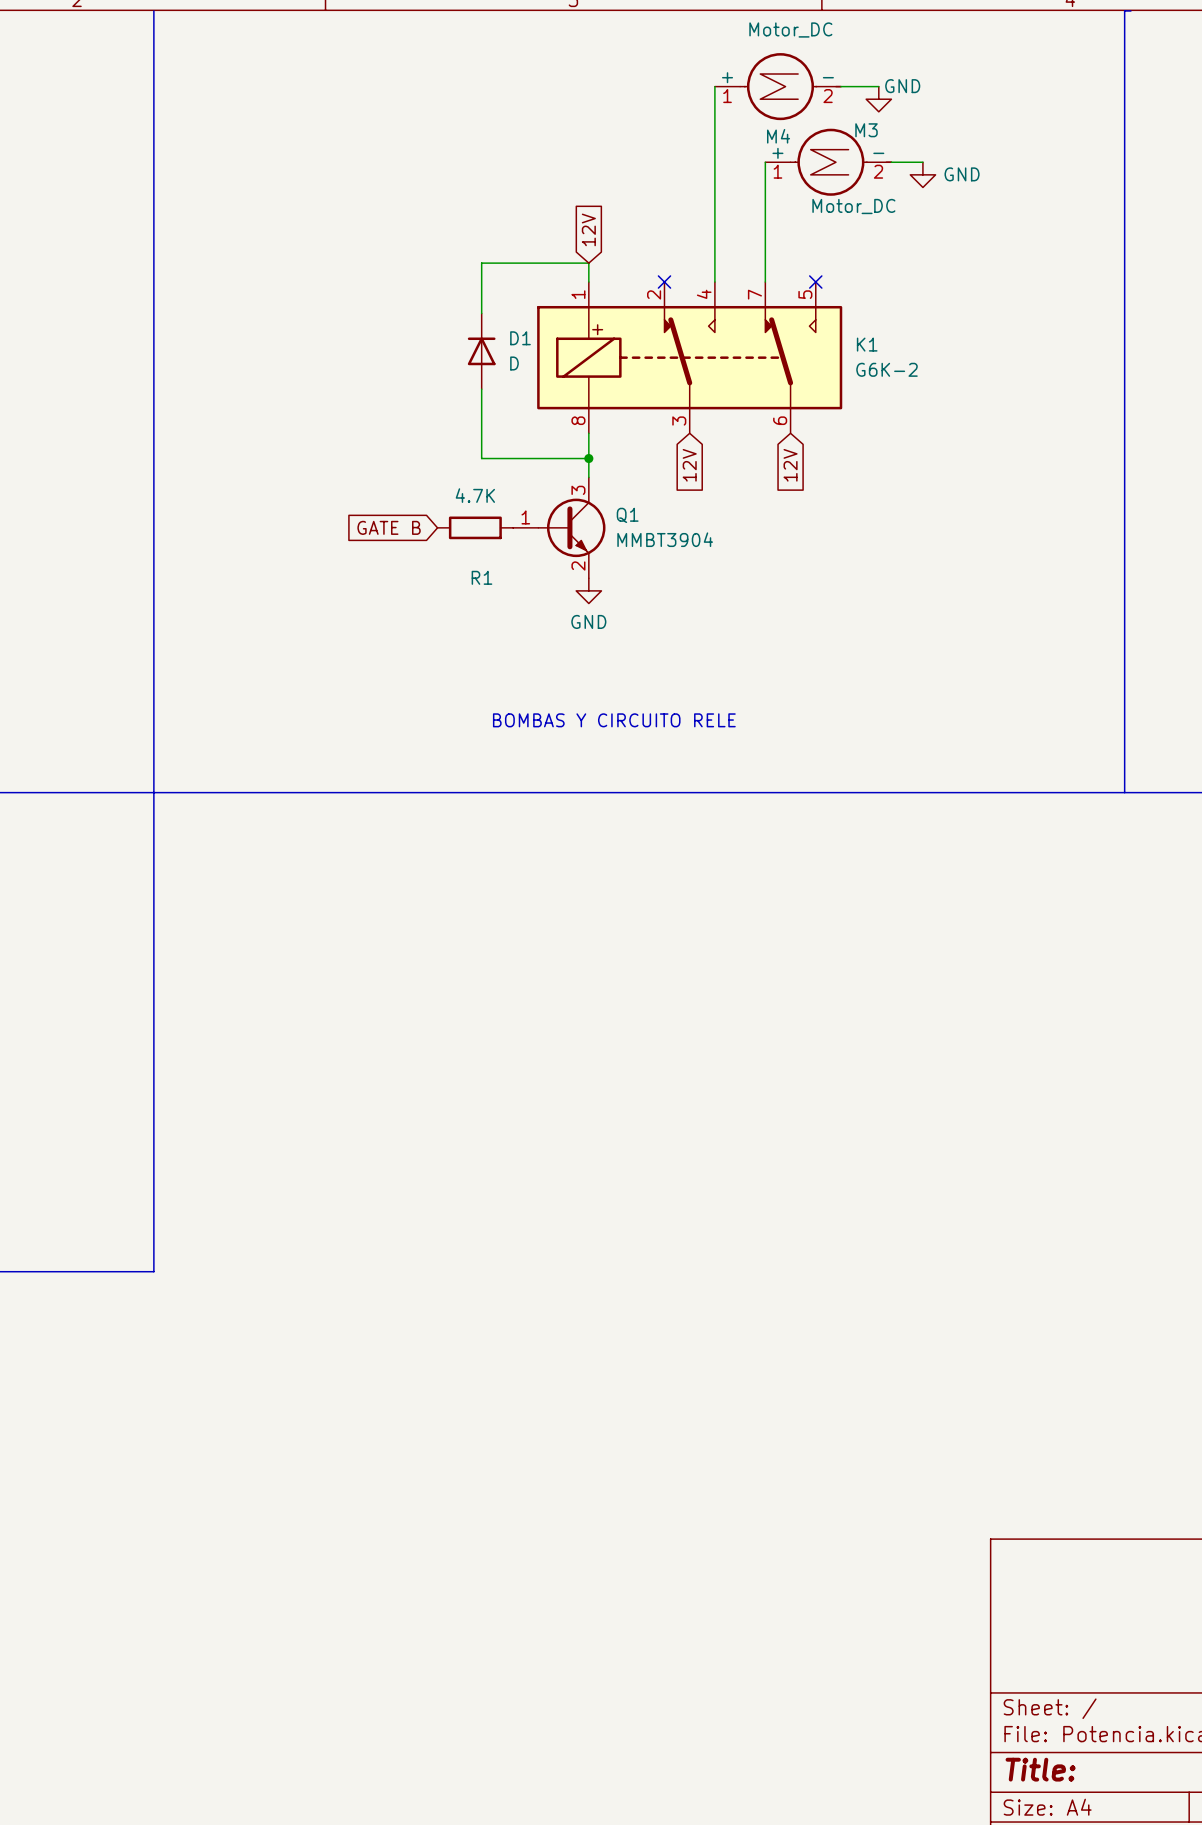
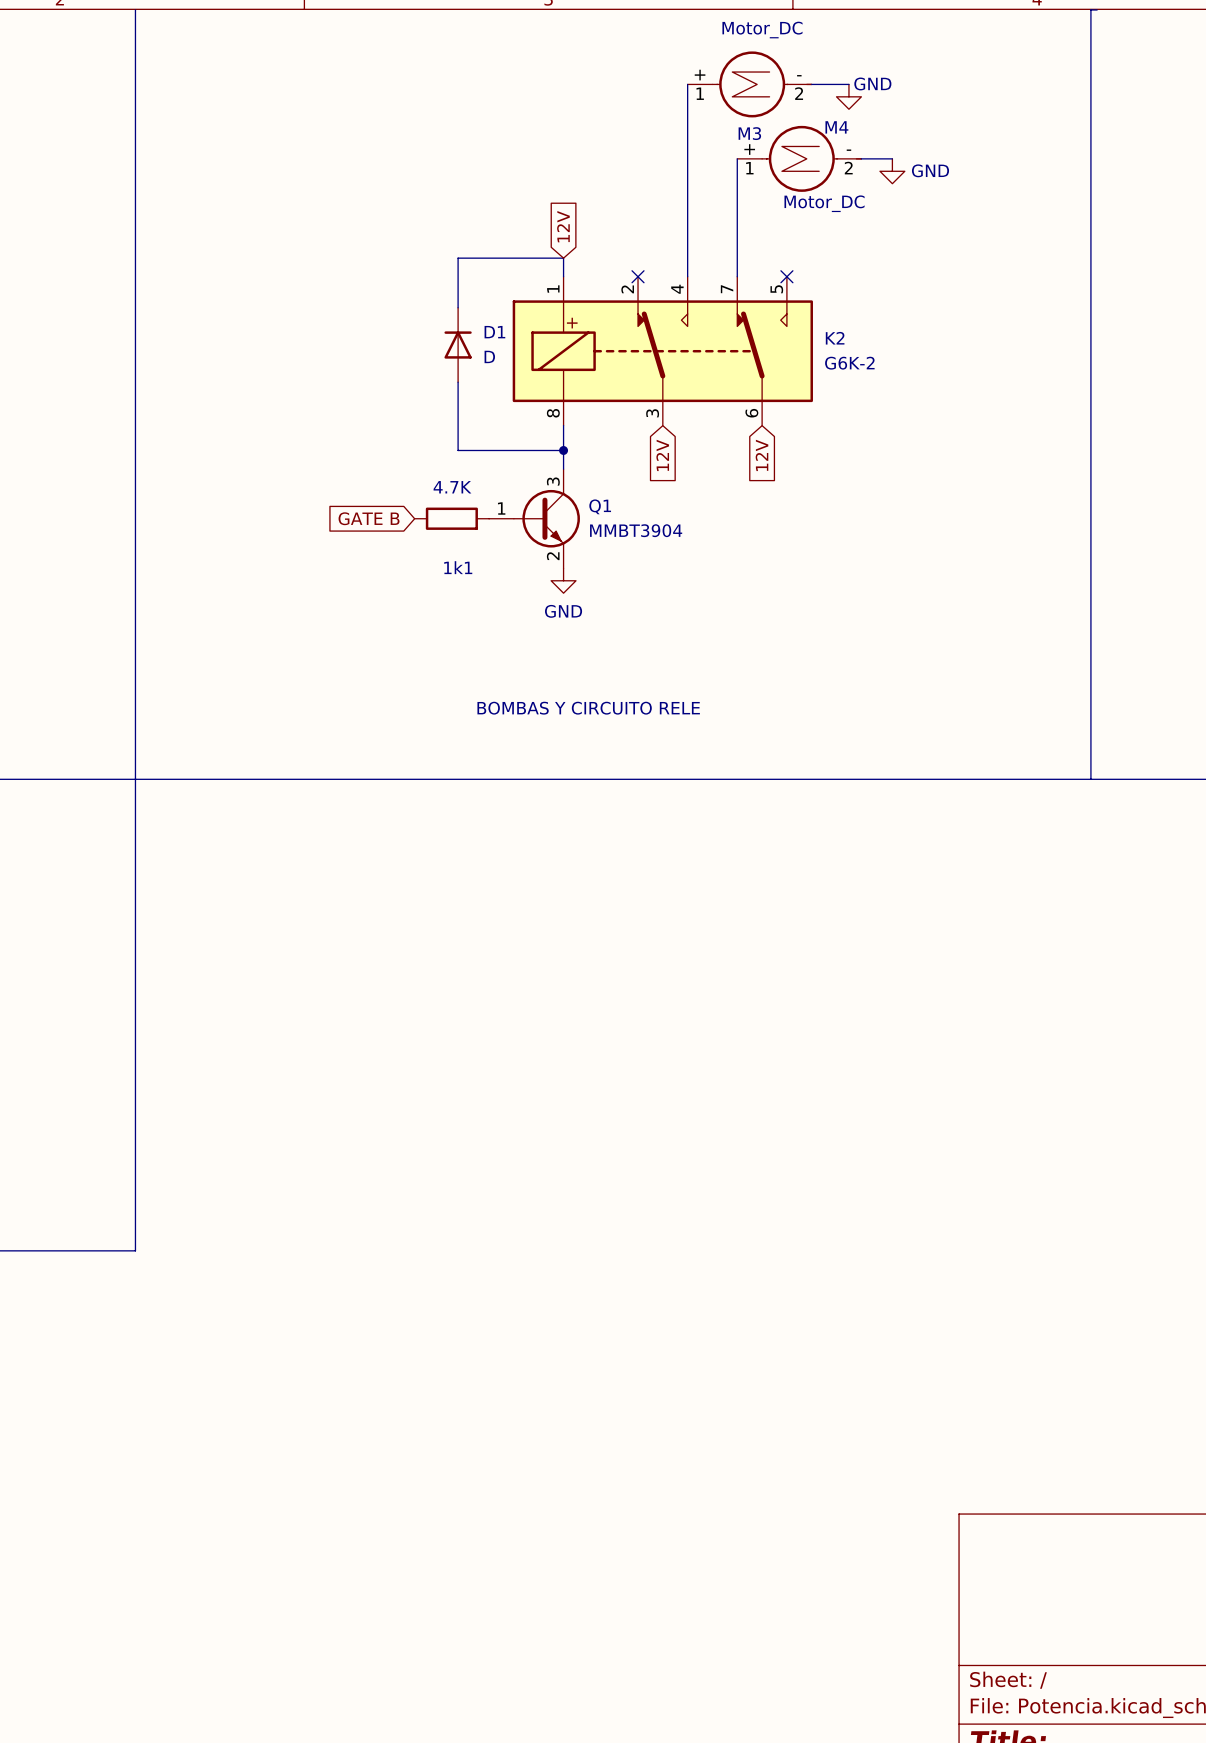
M3 name: M3 (866, 130) -> M4 (836, 127)
M4 name: M4 (778, 136) -> M3 (749, 133)
K1 name: K1 (867, 344) -> K2 (835, 338)
R1 name: R1 (481, 577) -> 1k1 (458, 567)

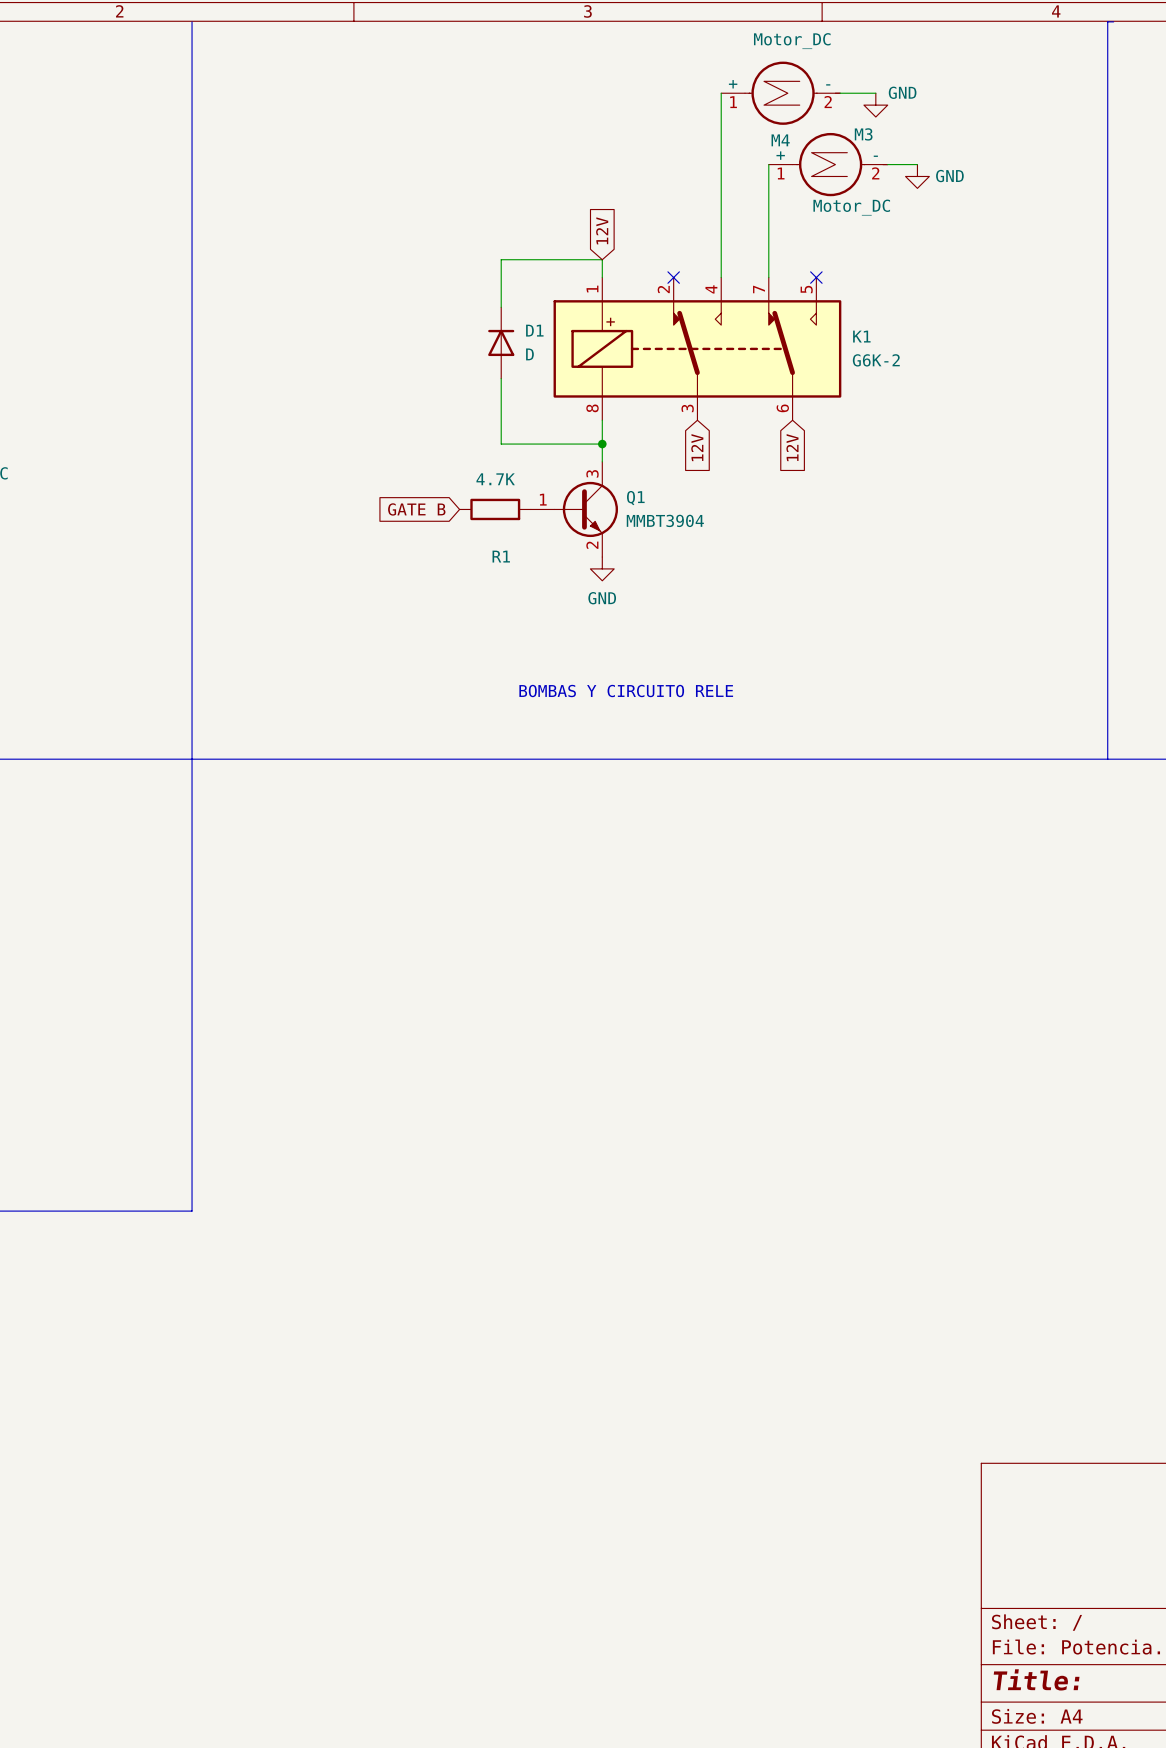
M4 name: M4 (836, 127) -> M3 (863, 134)
M3 name: M3 (749, 133) -> M4 (780, 140)
K2 name: K2 (835, 338) -> K1 (861, 336)
1k1 name: 1k1 (458, 567) -> R1 (501, 556)

